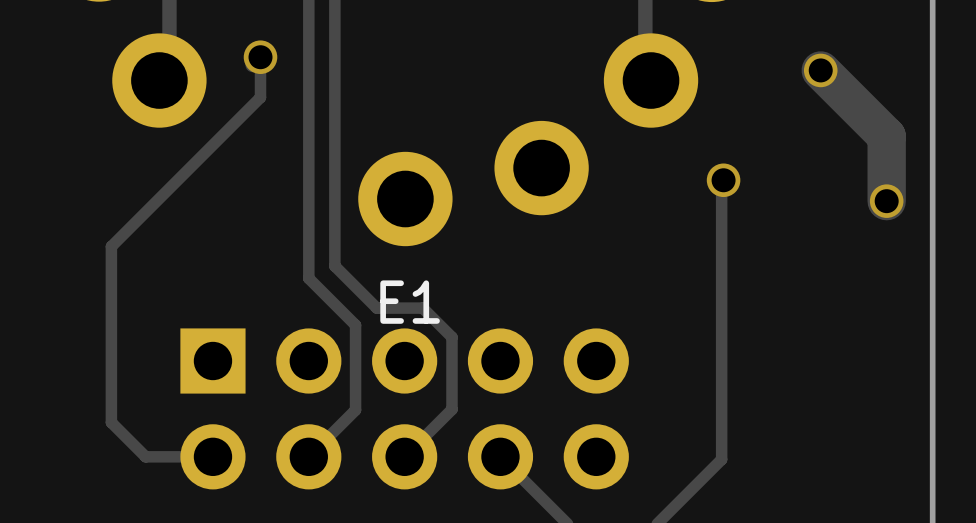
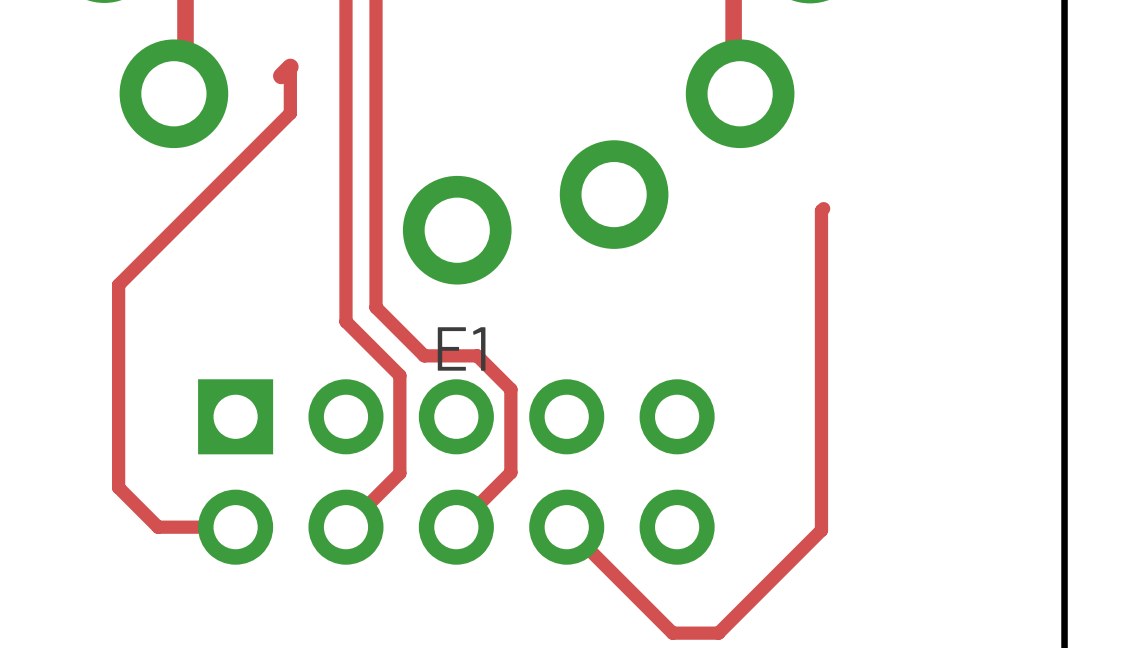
via: (260, 57) -> none
track: (820, 70) (886, 136) (886, 201) -> none
via: (820, 70) -> none
via: (723, 180) -> none
via: (886, 201) -> none

